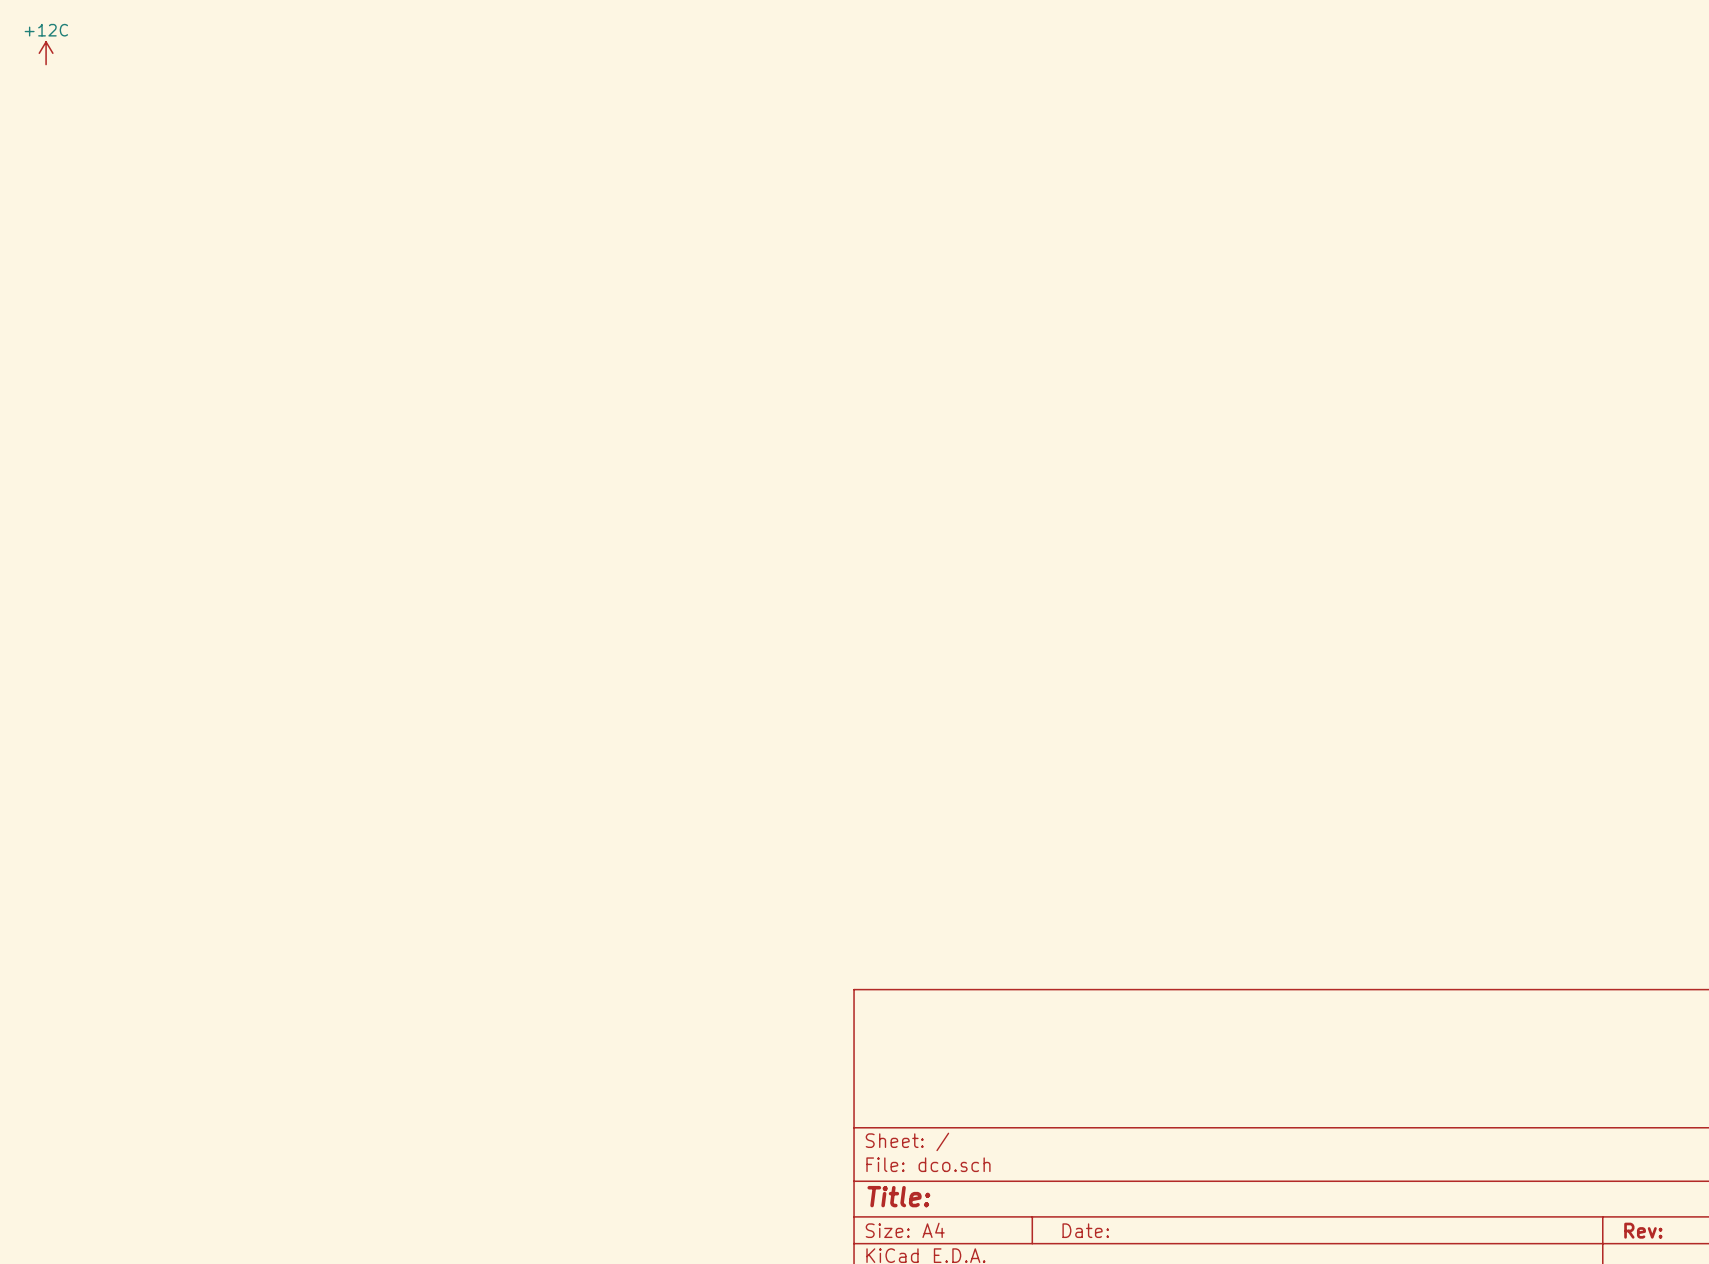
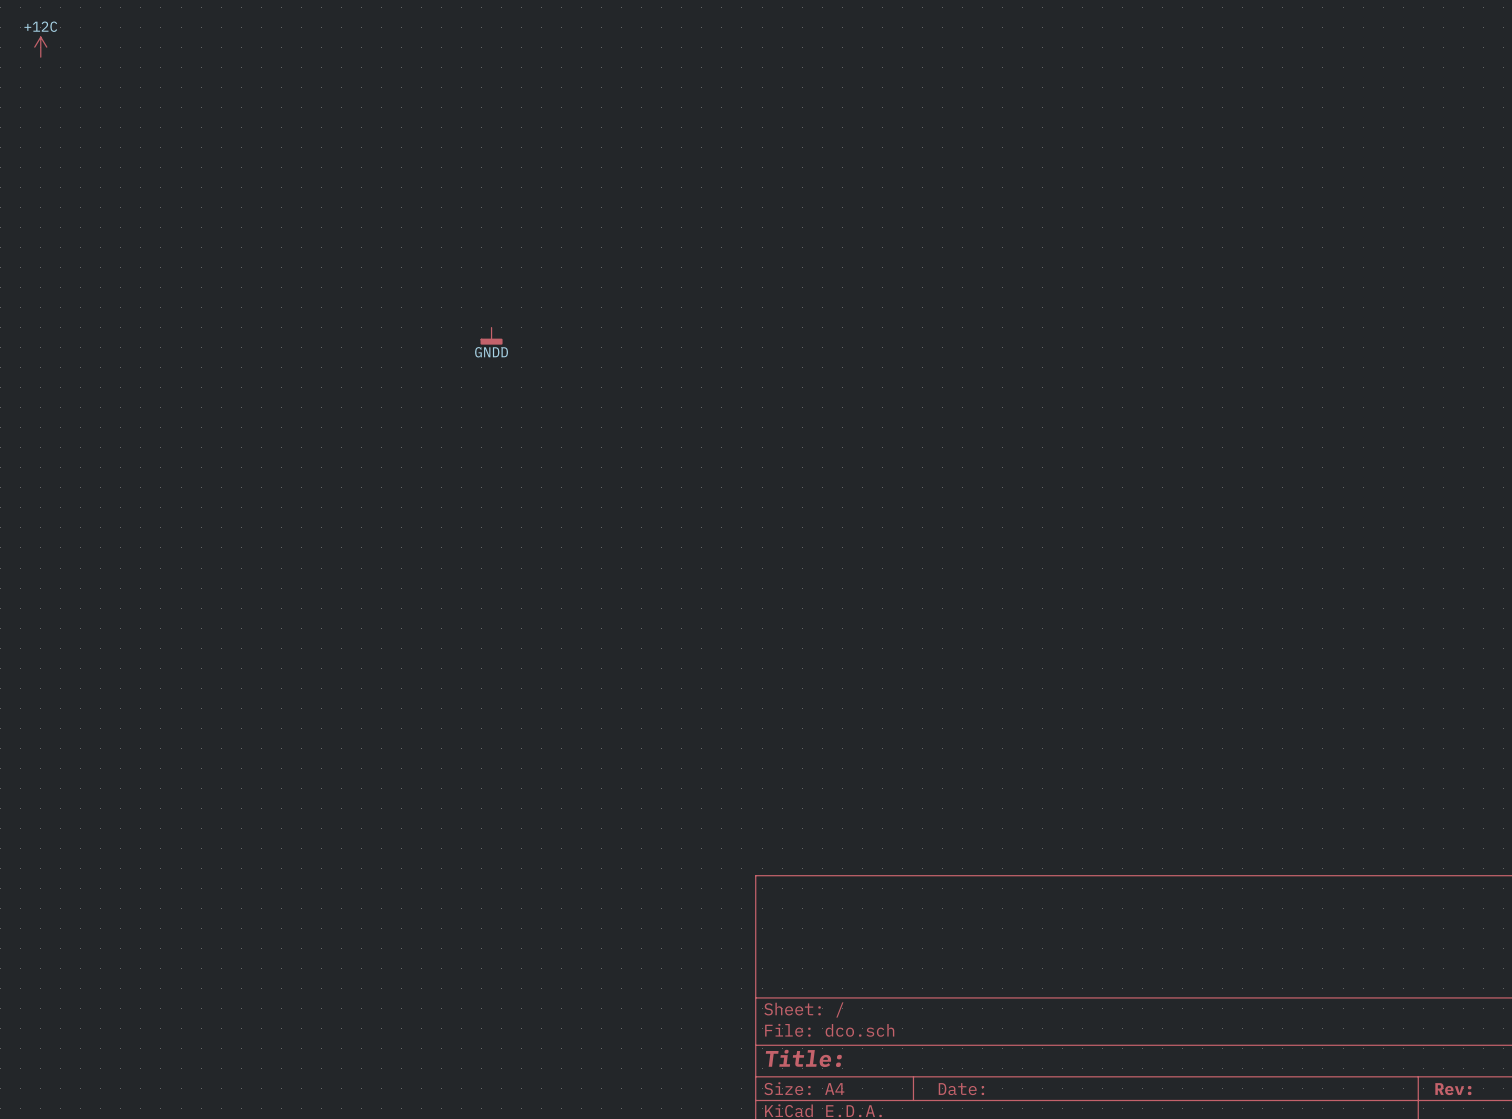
power symbol: none -> GNDD (491, 336)

